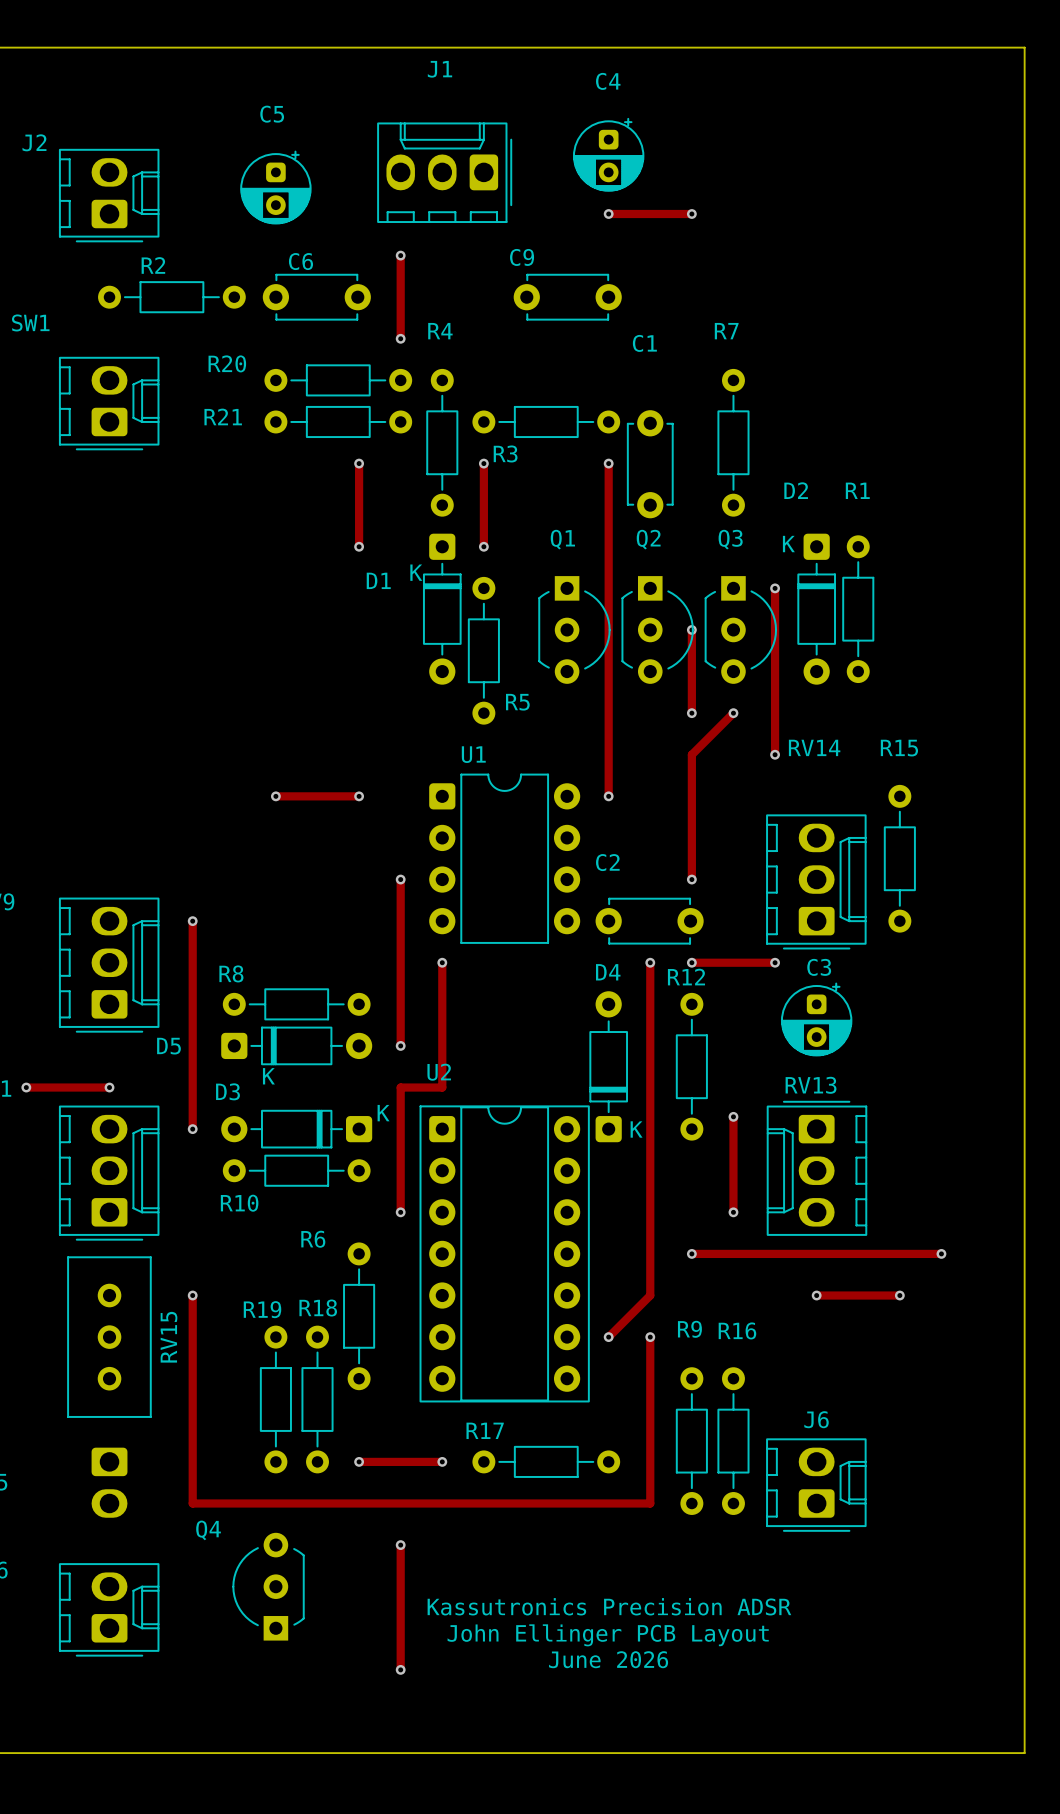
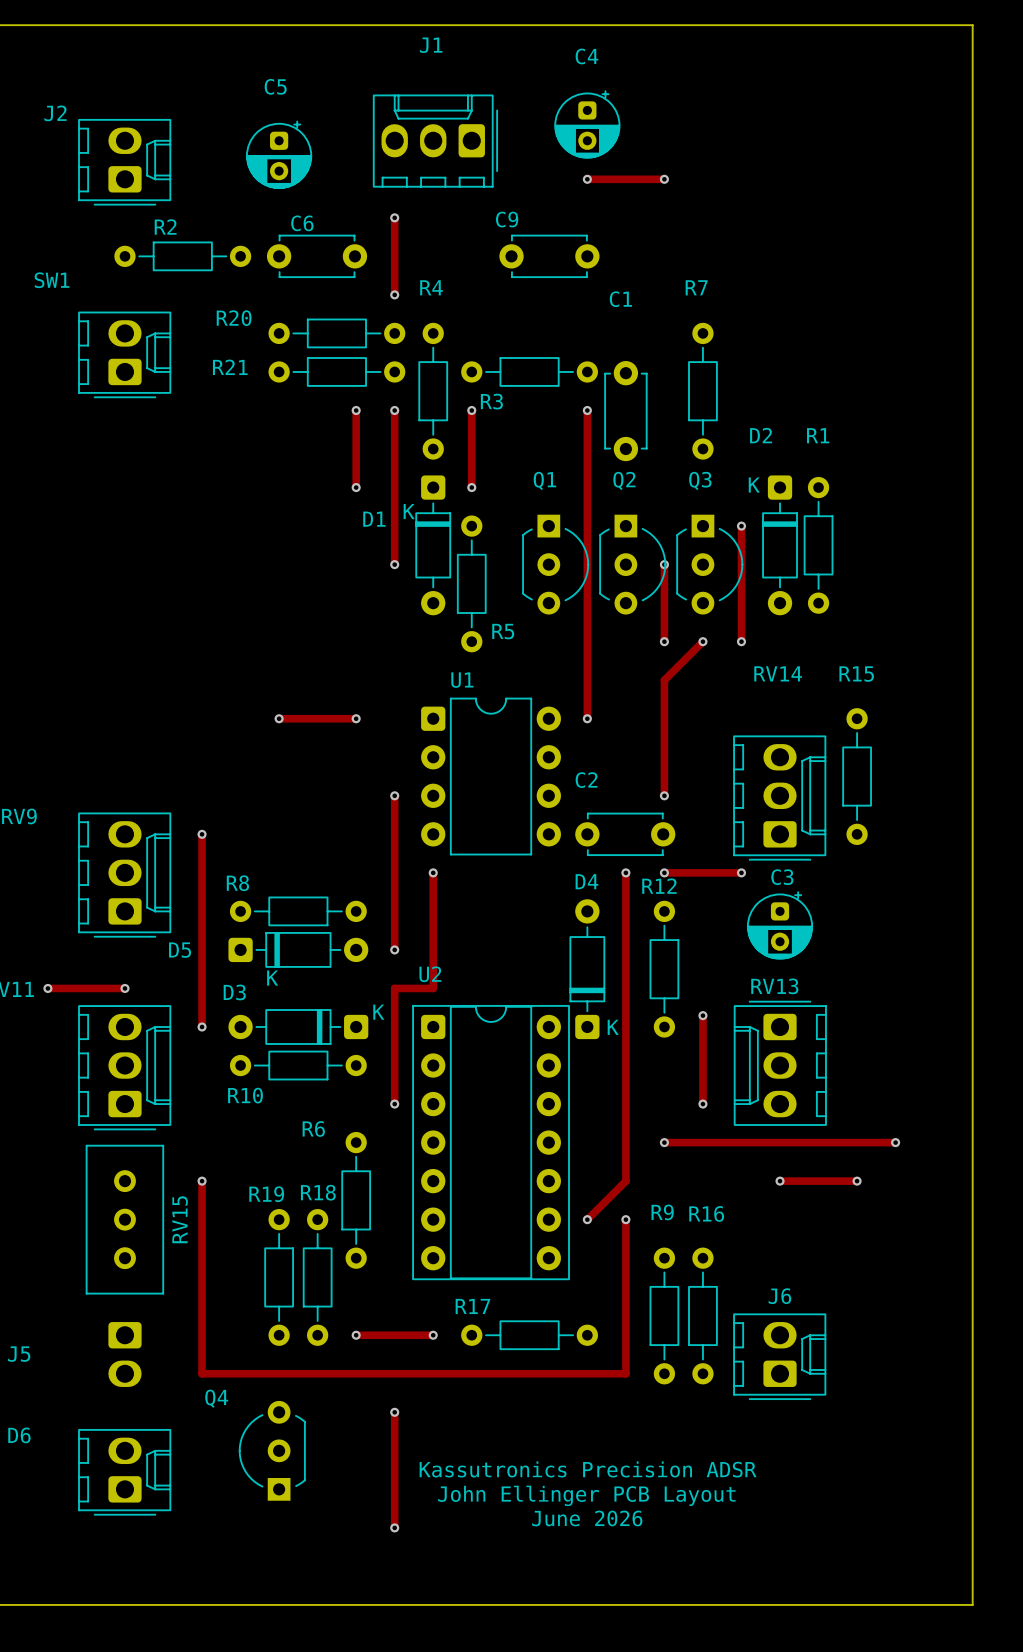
track: none -> (394, 410) (394, 564)
via: none -> (394, 410)
via: none -> (394, 564)
track: (775, 713) (775, 754) -> none
via position: (775, 754) -> (741, 641)

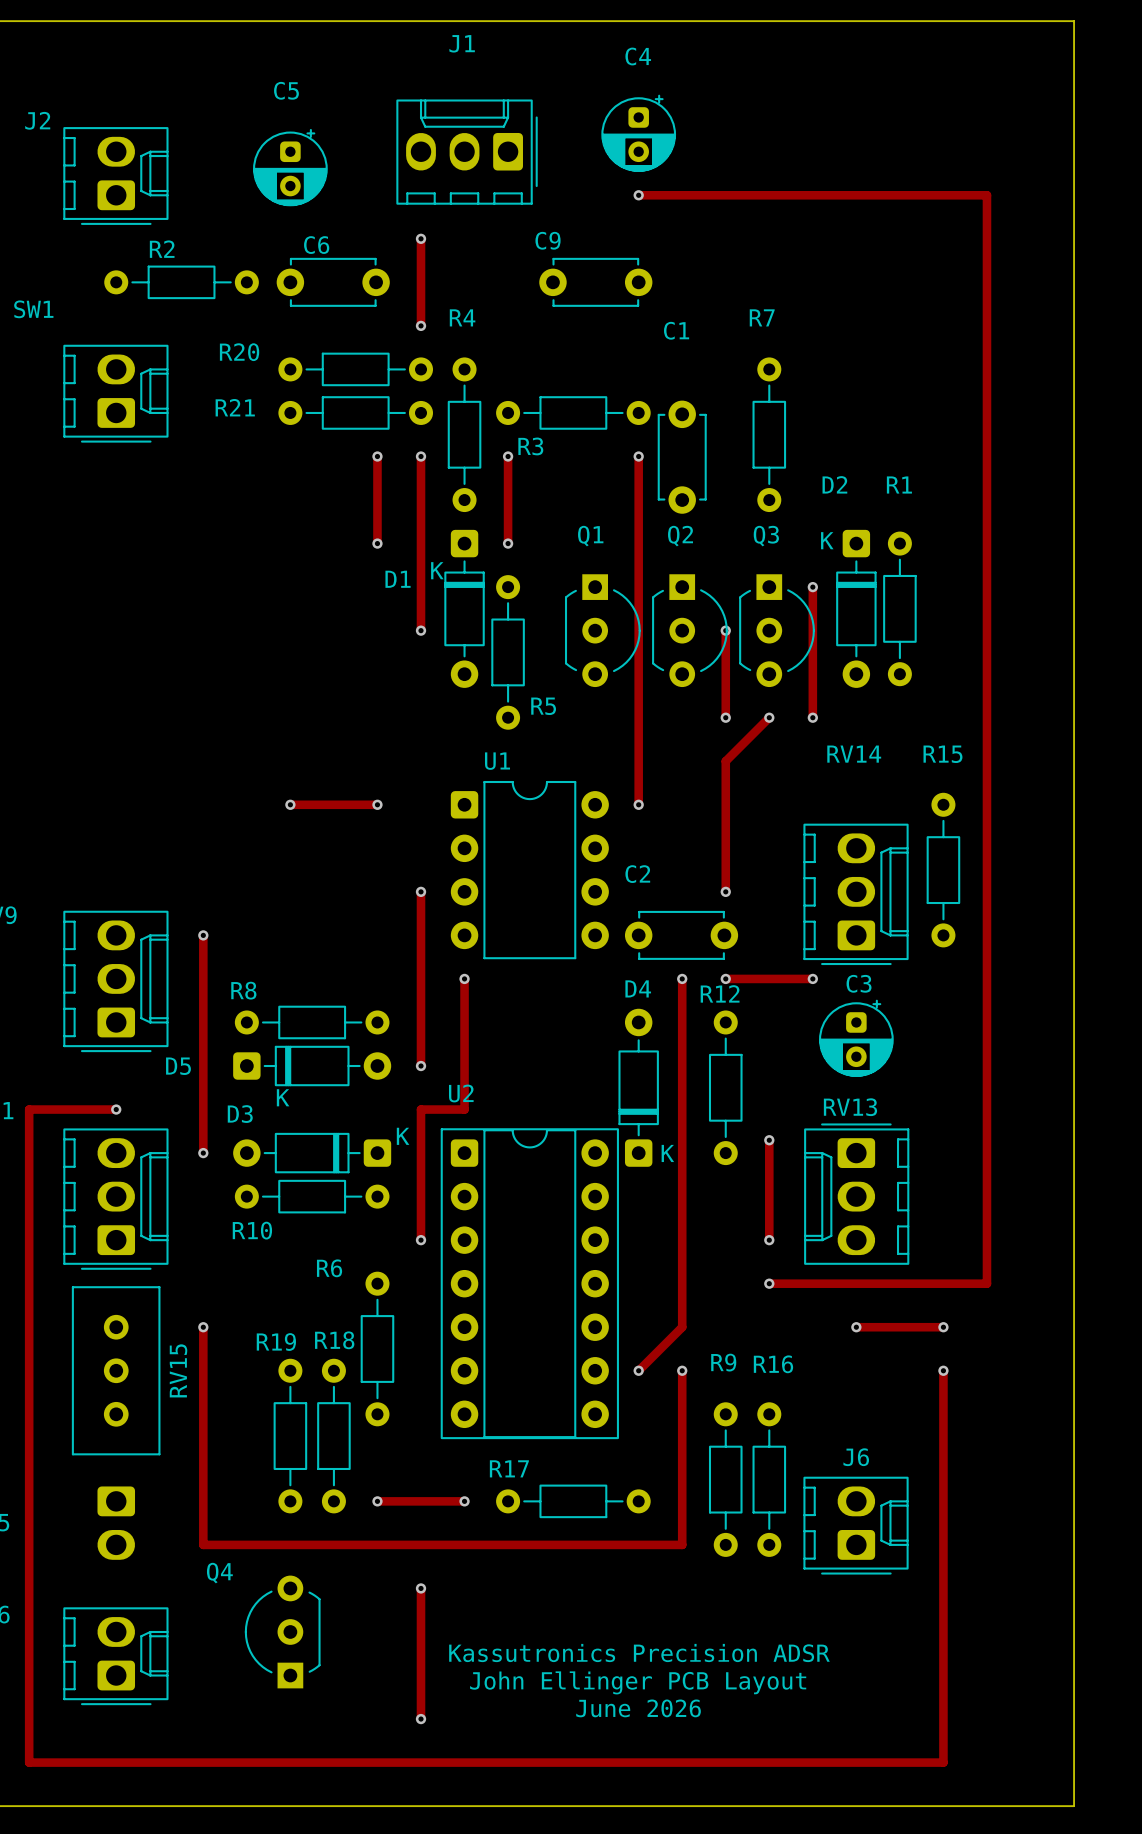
track: none -> (725, 195) (986, 195) (986, 1283)
via: (664, 179) -> none
track: none -> (29, 1109) (29, 1762) (943, 1762) (943, 1370)
via: (47, 988) -> none
track: (664, 1142) (702, 1142) -> none
via position: (664, 1142) -> (769, 1283)
via position: (895, 1142) -> (943, 1370)

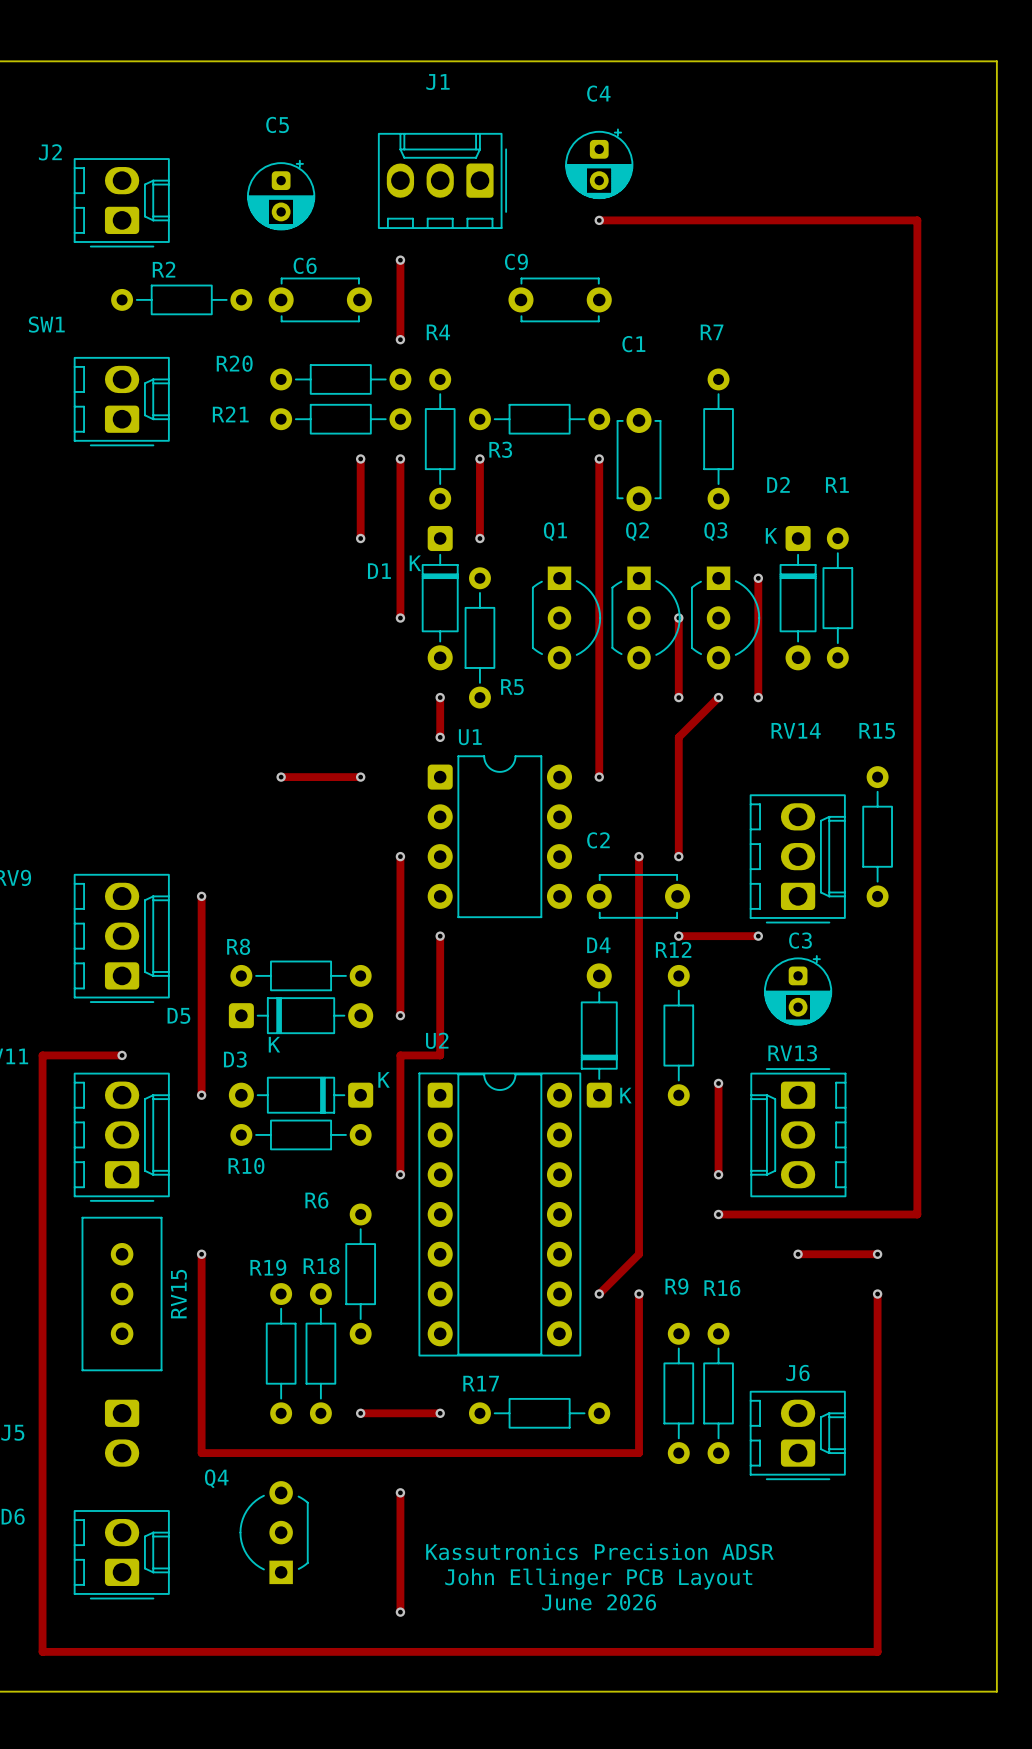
track: none -> (440, 697) (440, 737)
via: none -> (440, 697)
via: none -> (440, 737)
track: none -> (639, 856) (639, 936)
via position: (682, 978) -> (639, 856)

